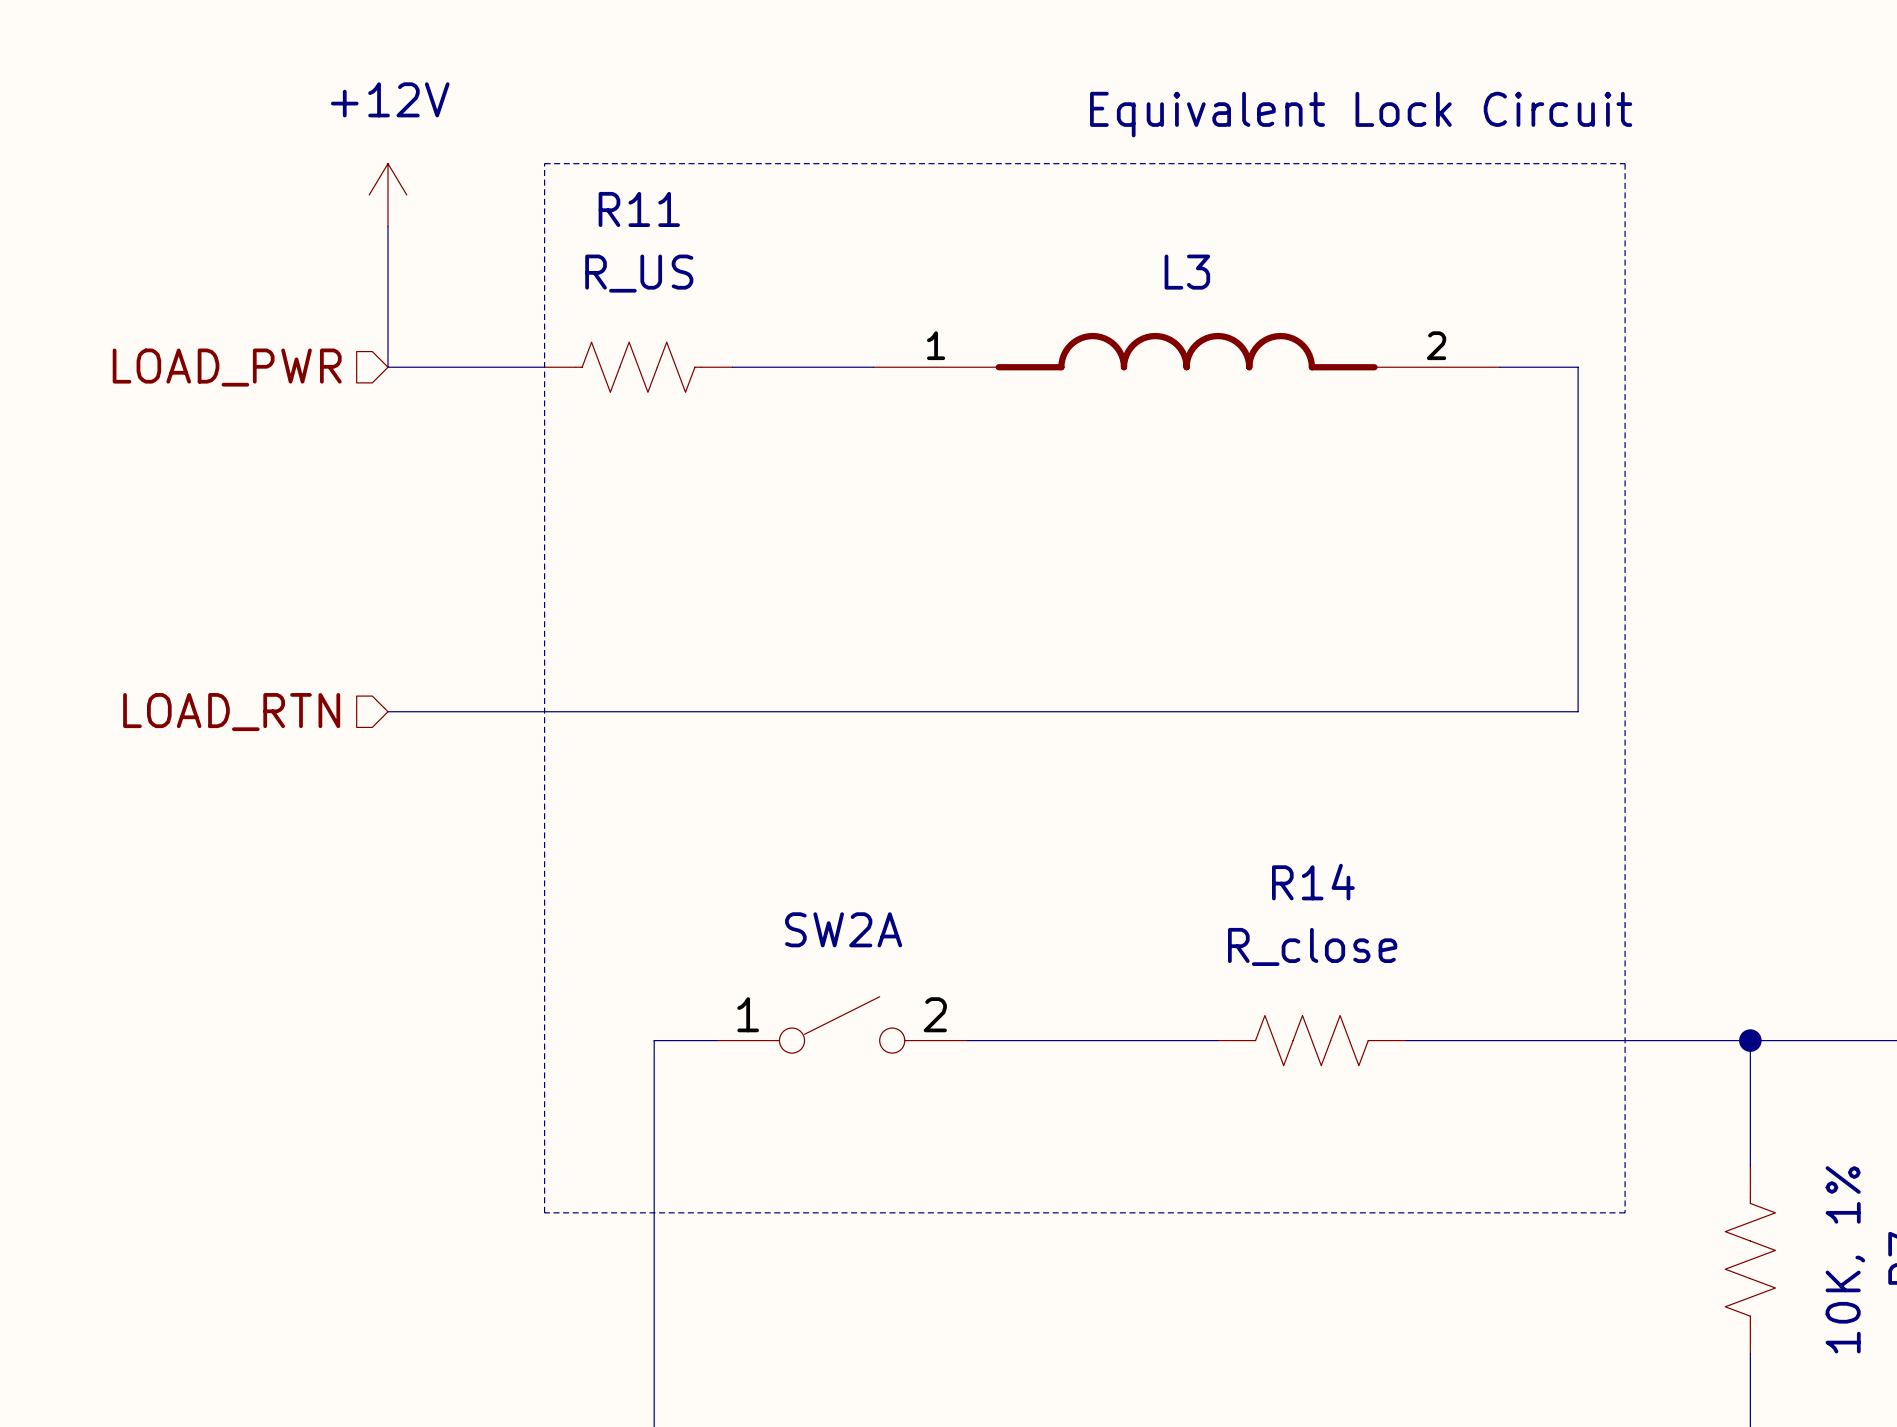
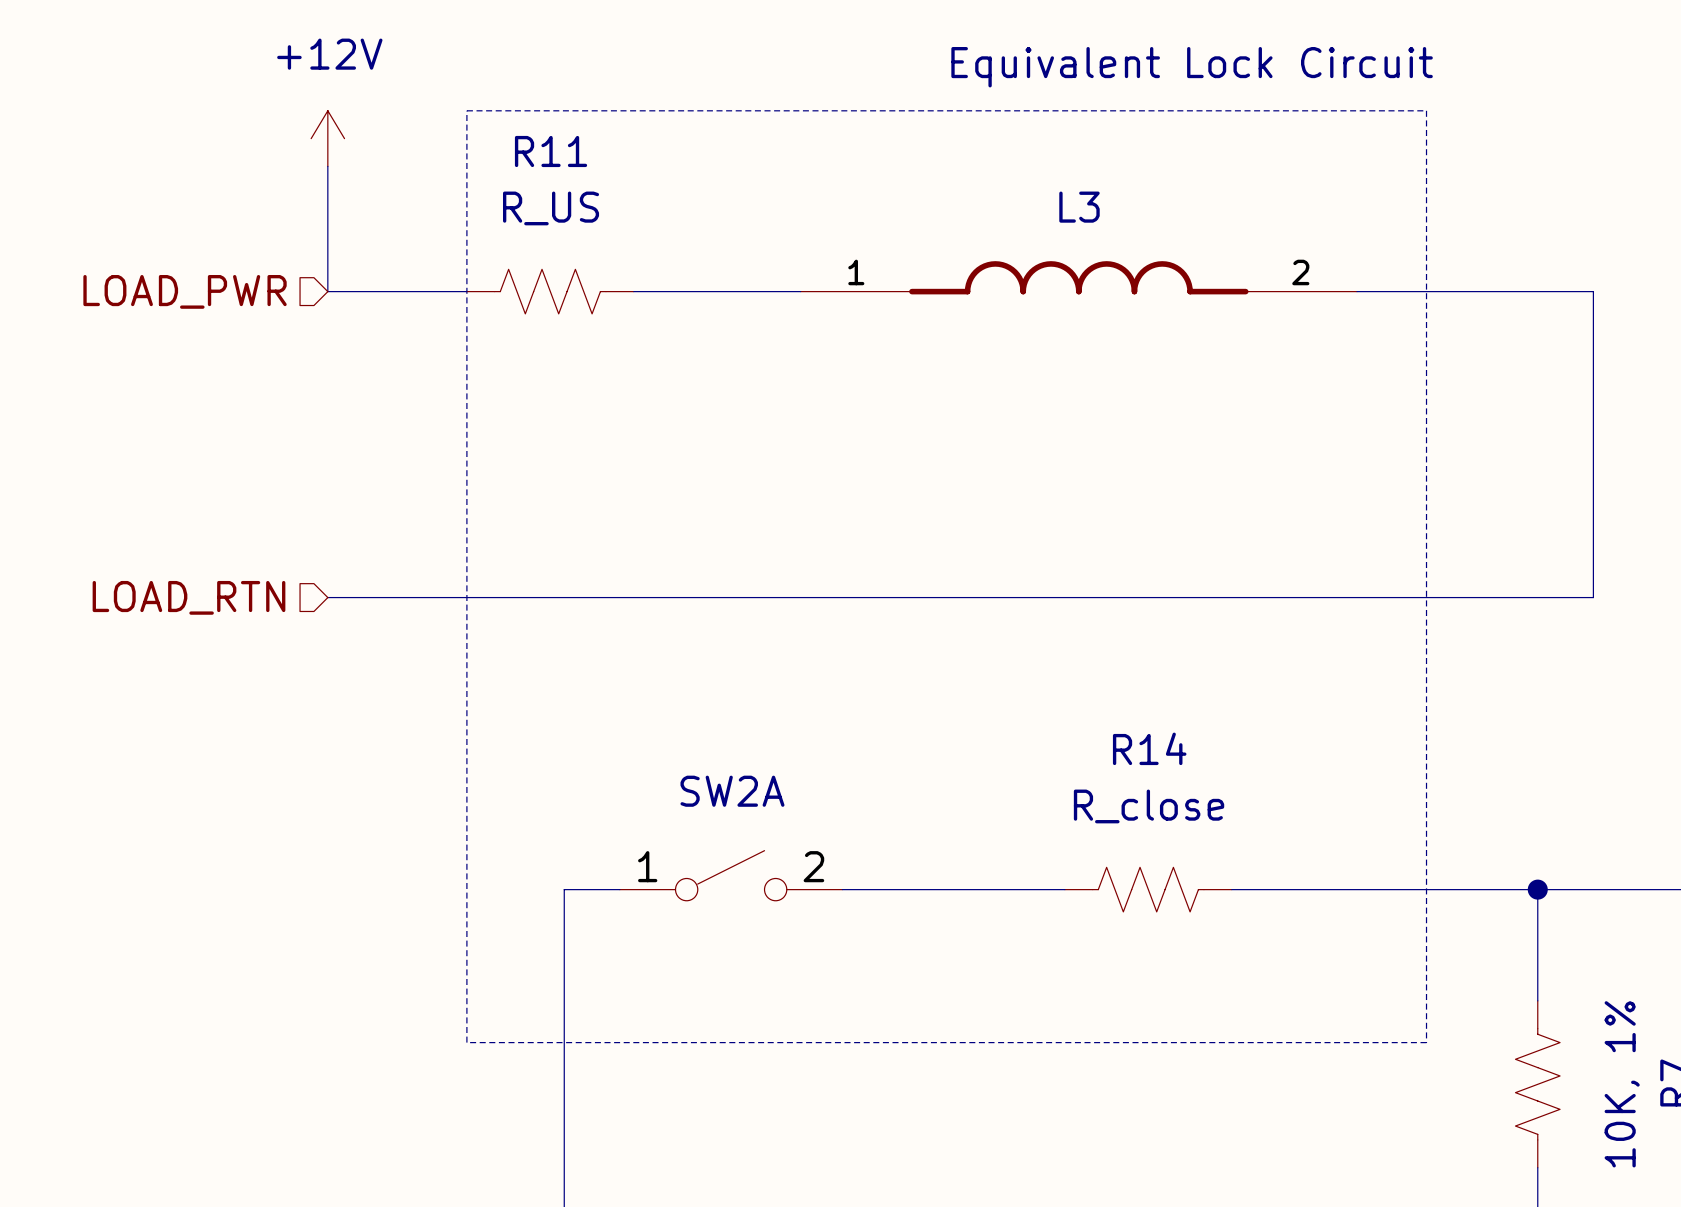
L3 position: (1186, 351) -> (1078, 277)
wire: (1578, 367) (1578, 711) -> (1384, 291) (1593, 291) (1593, 597) (1384, 597)

